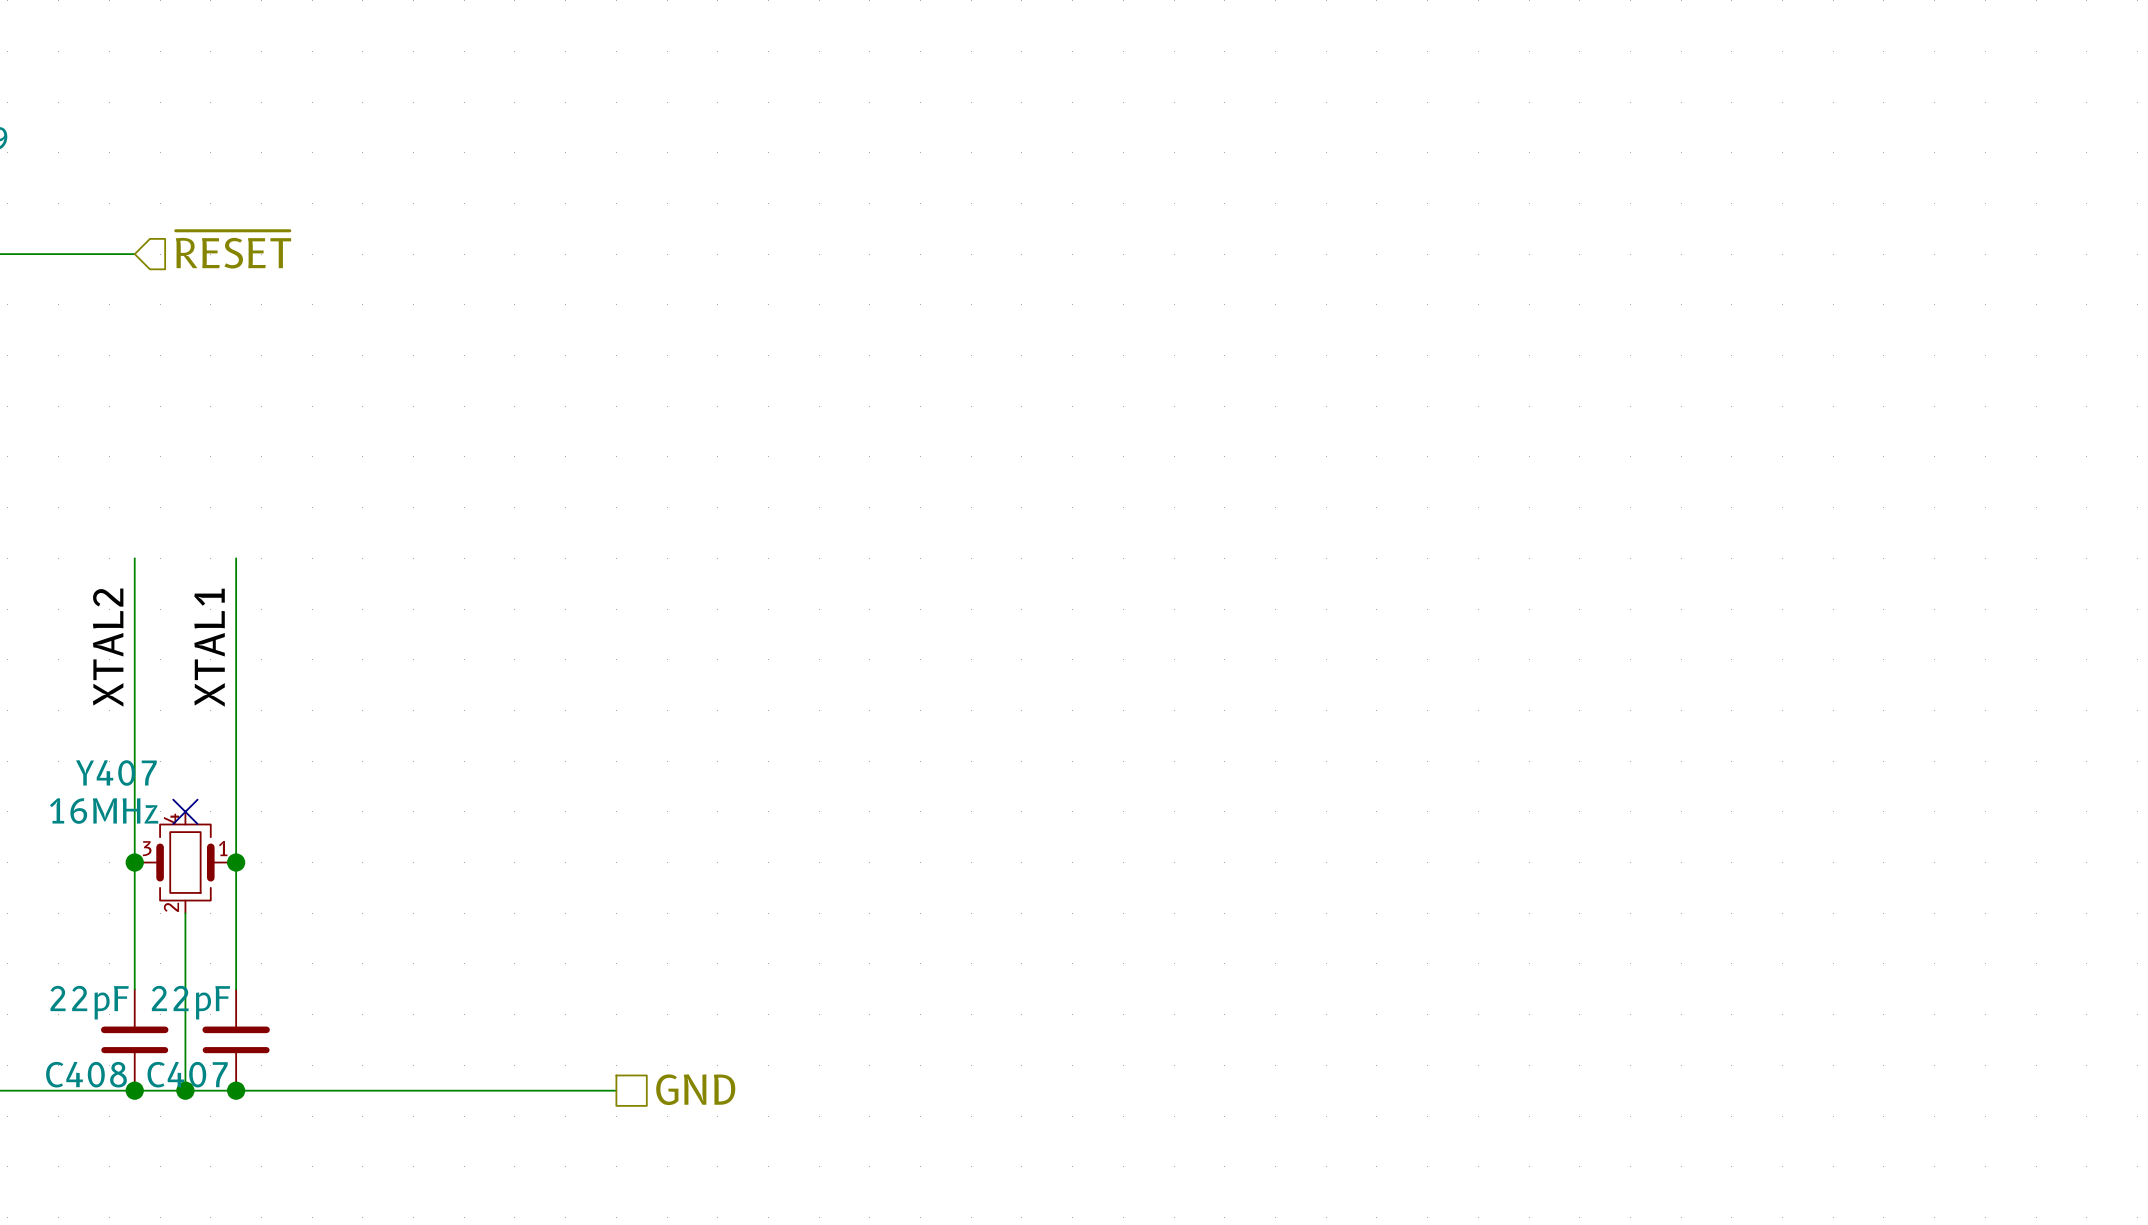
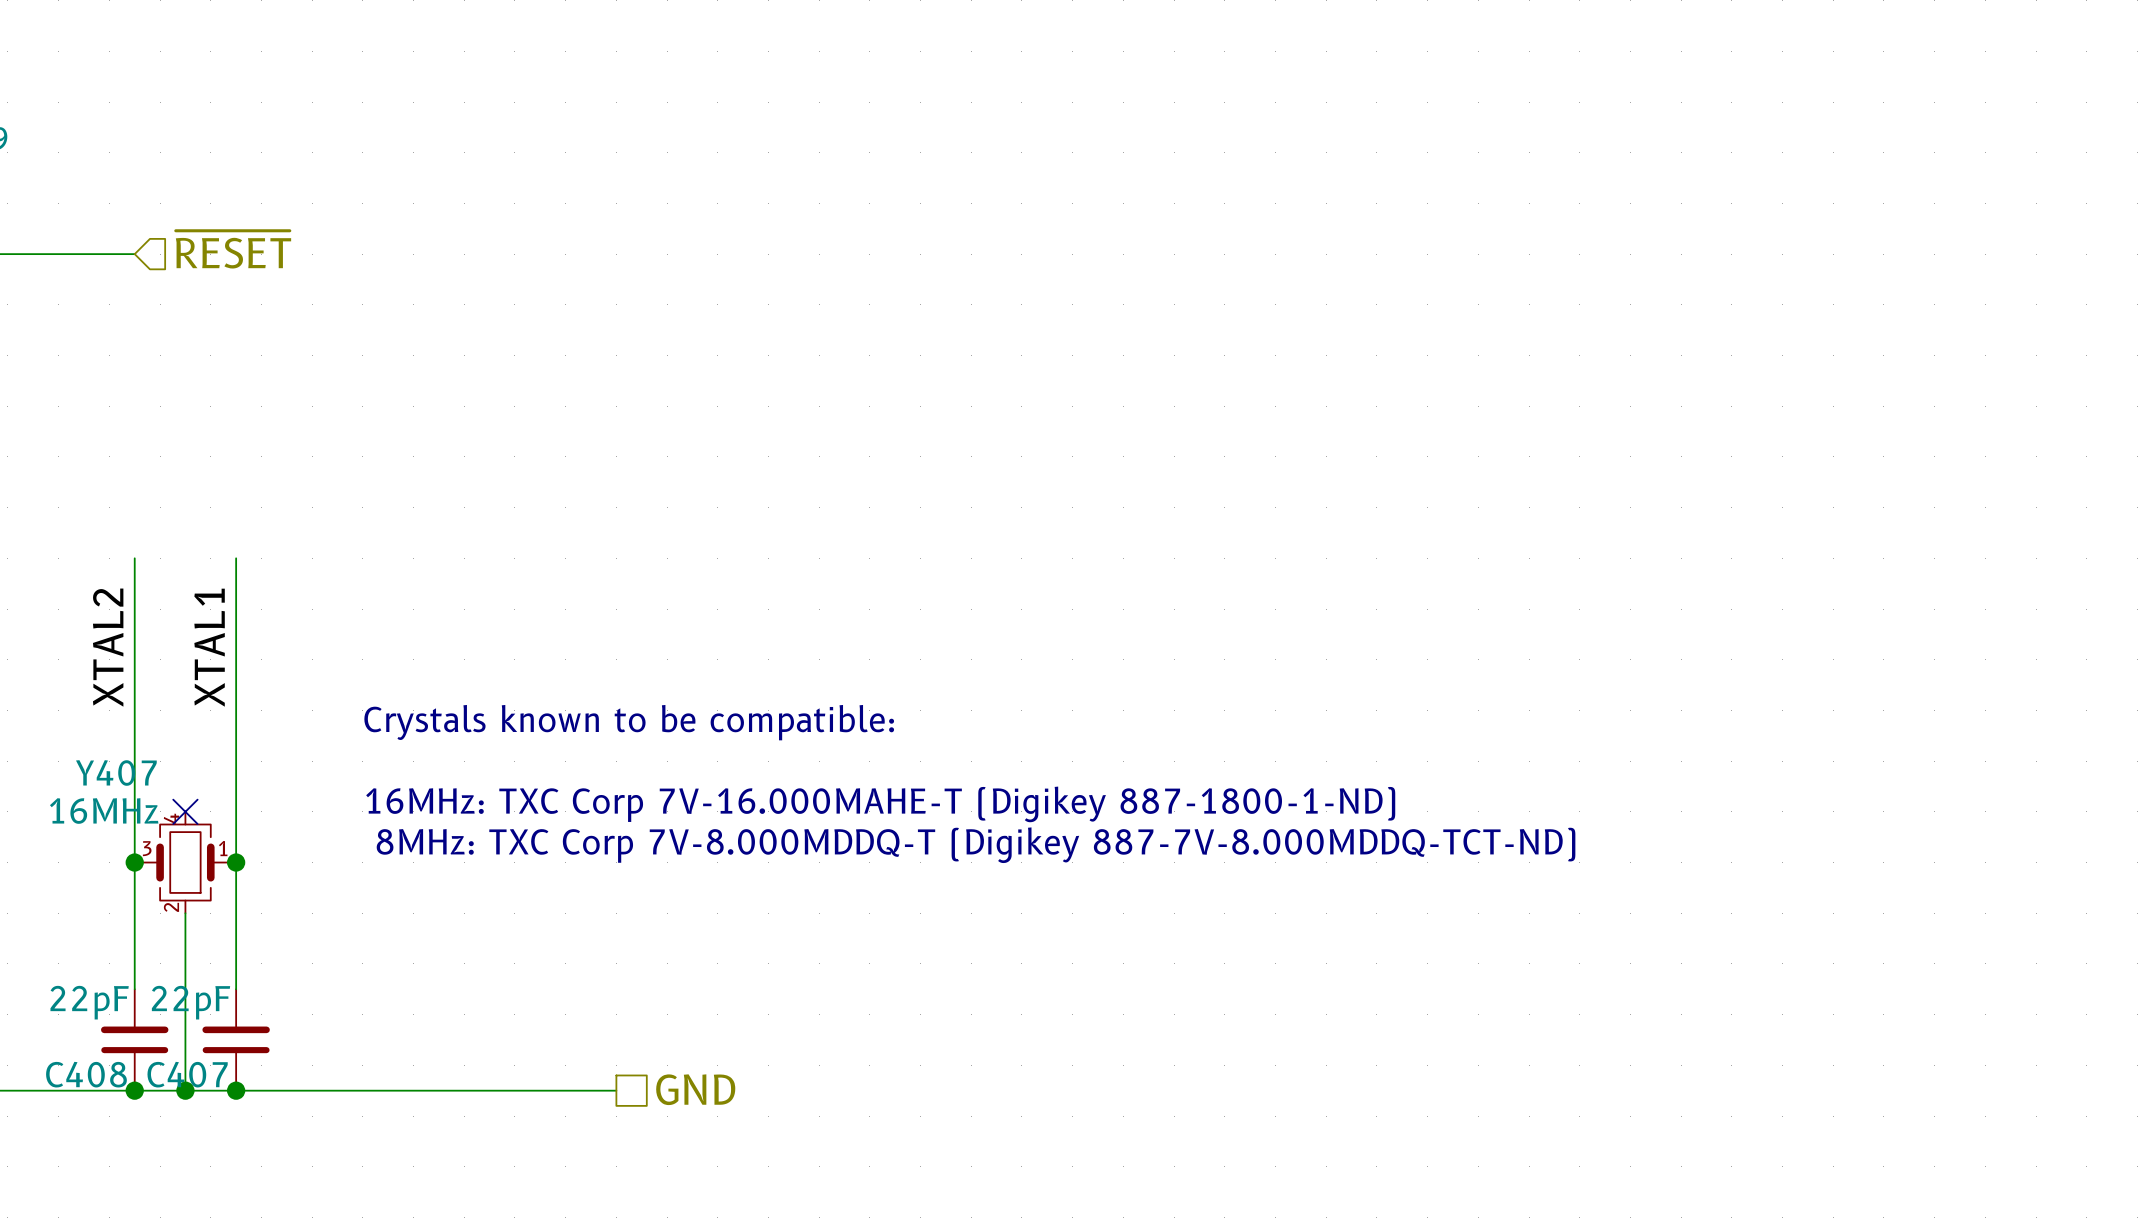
text: none -> Crystals known to be compatible: (629, 722)
text: none -> 16MHz: TXC Corp 7V-16.000MAHE-T (Digikey 887-1800-1-ND) (880, 804)
text: none -> 8MHz: TXC Corp 7V-8.000MDDQ-T (Digikey 887-7V-8.000MDDQ-TCT-ND) (976, 845)

